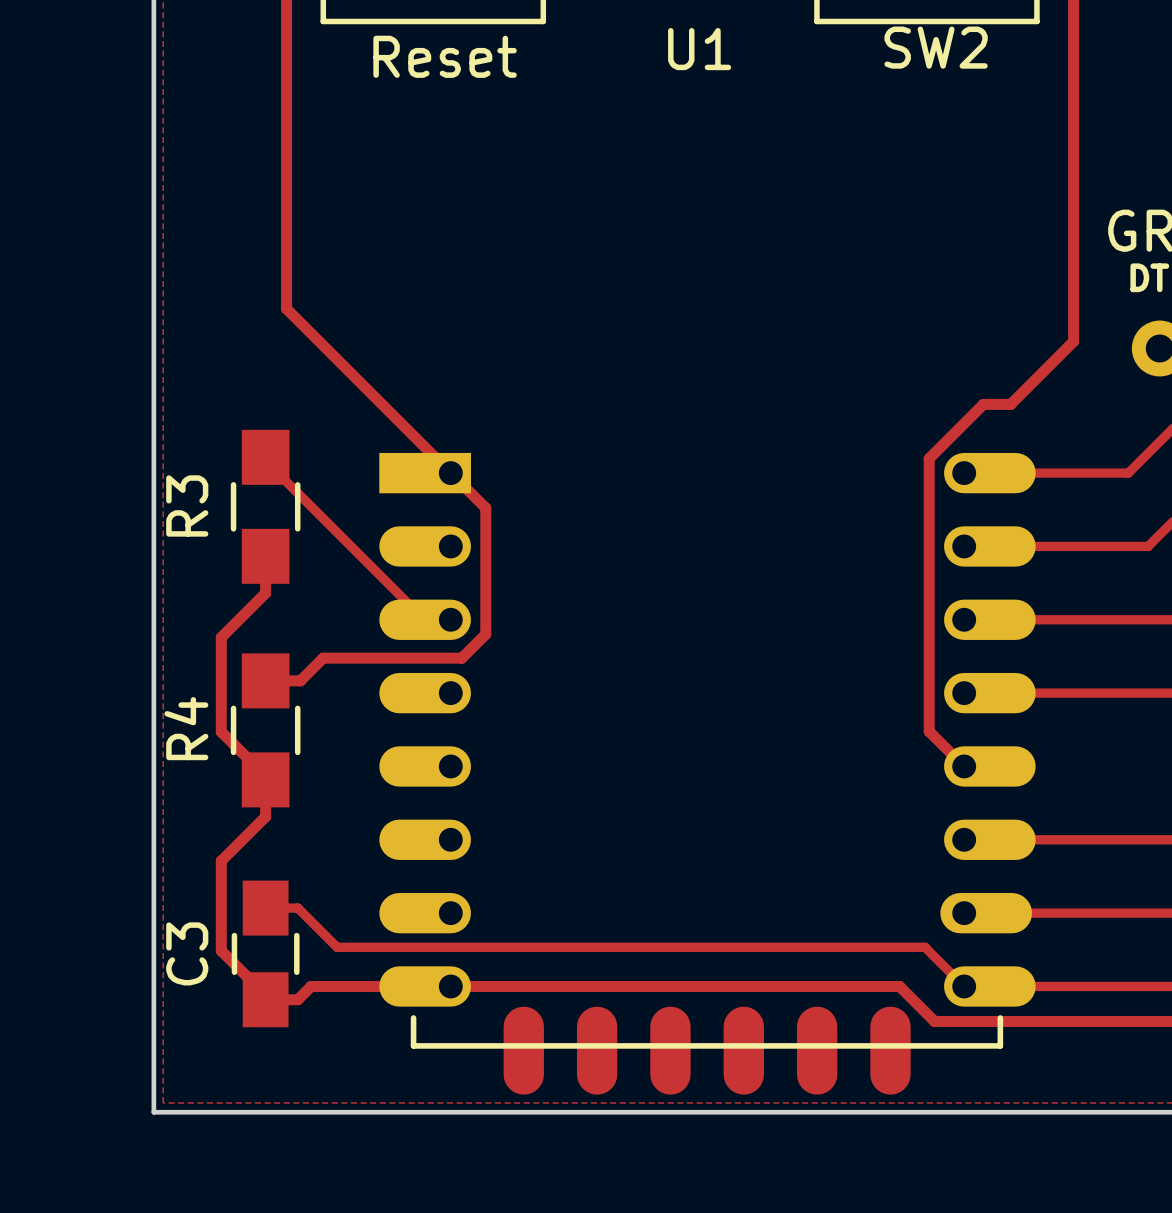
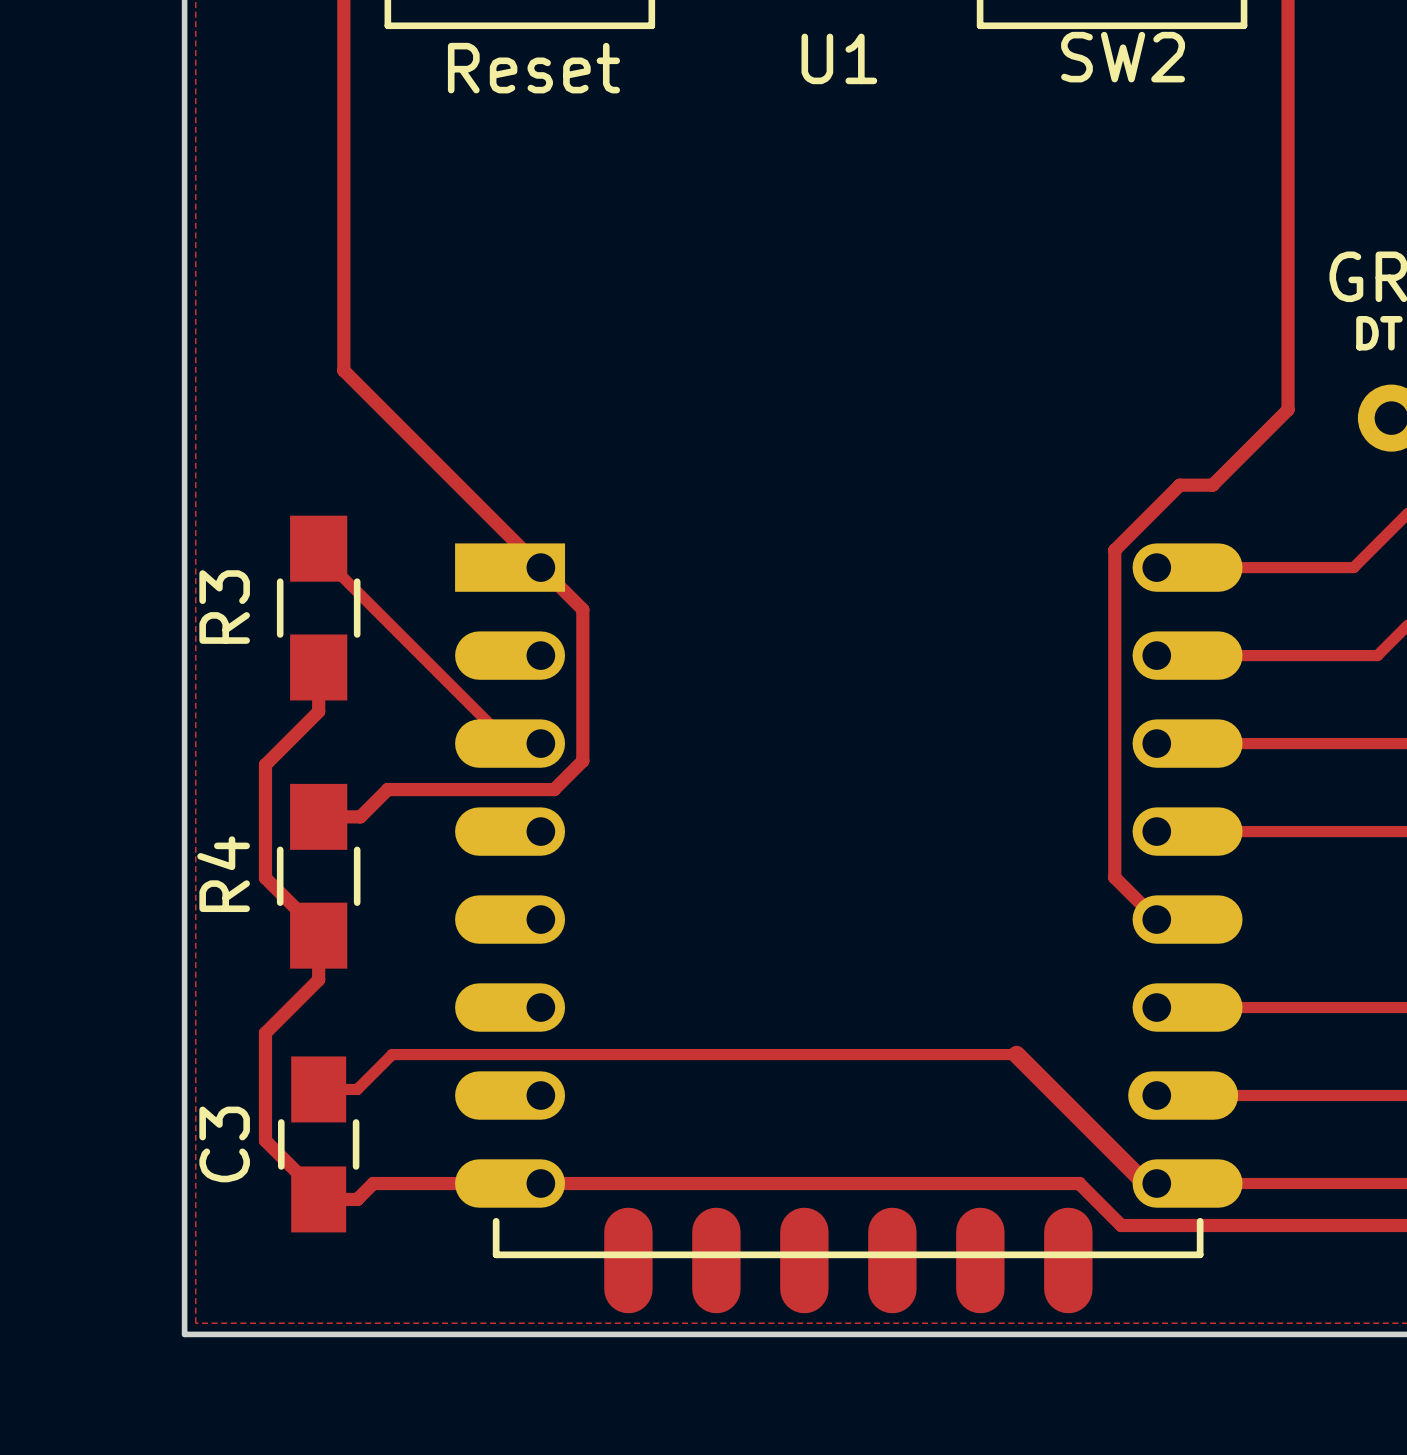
track: (297, 908) (337, 947) (924, 947) (964, 986) -> (357, 1089) (392, 1054) (1016, 1054) (1145, 1183) (1156, 1183)

